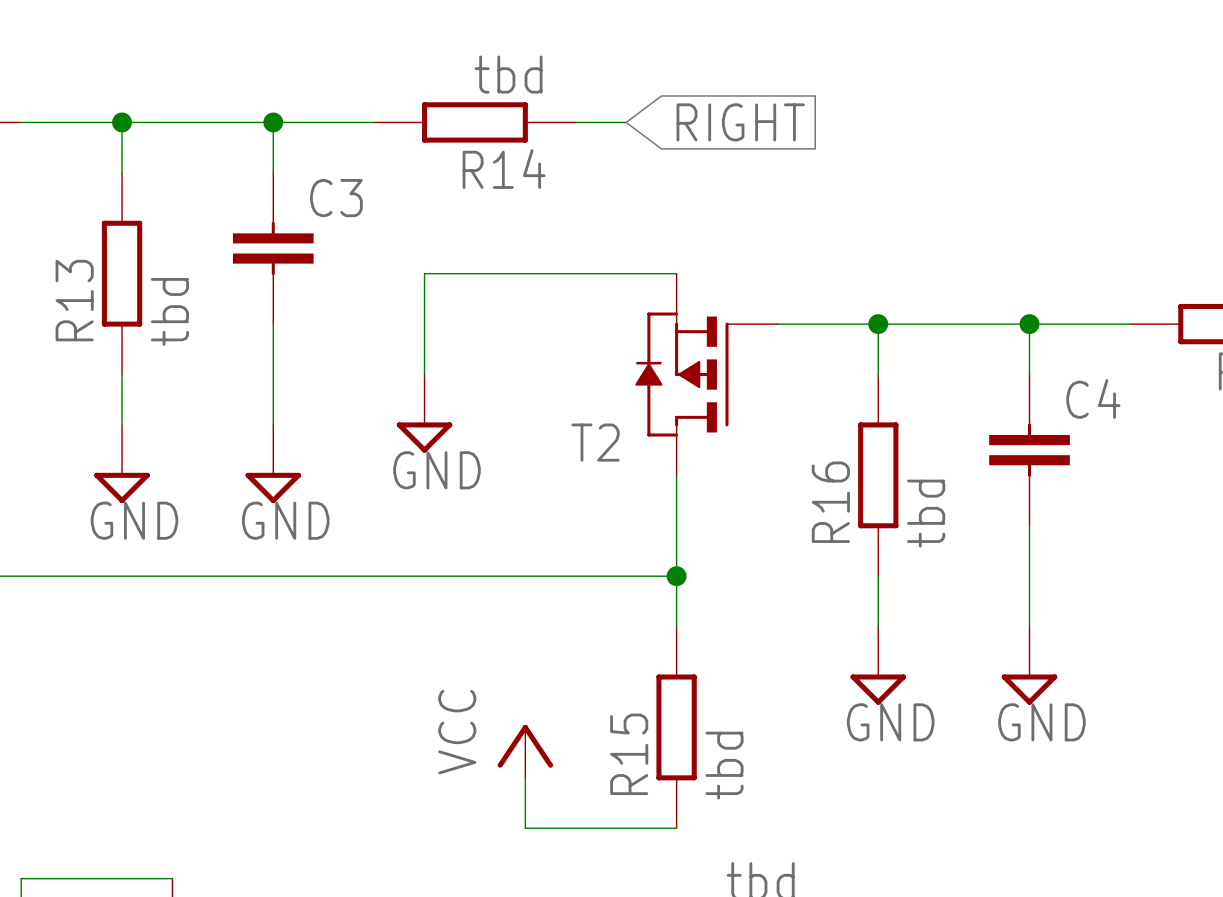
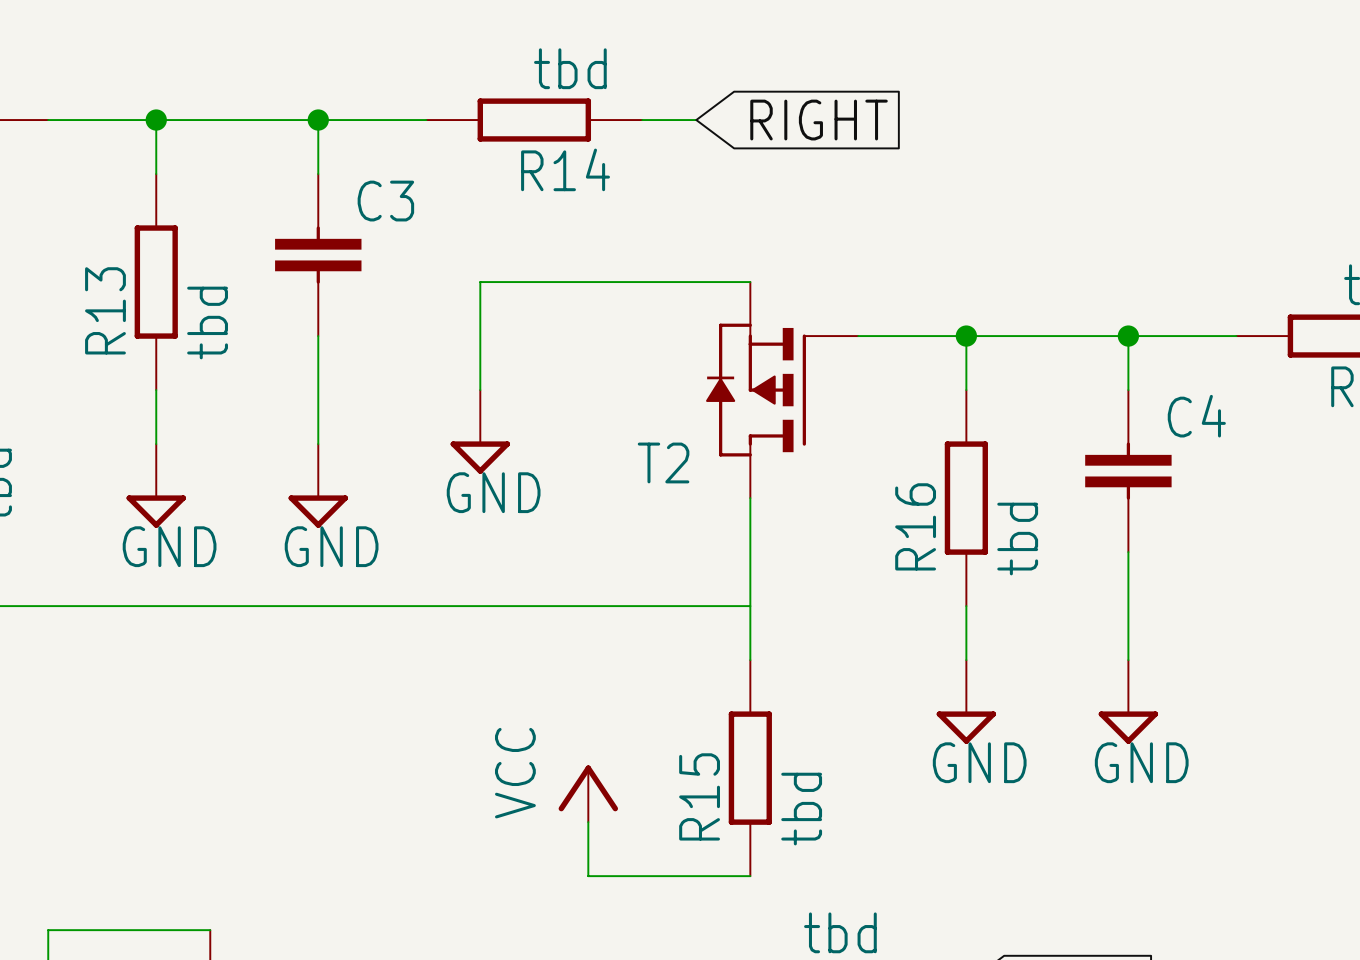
junction: (676, 576) -> none

